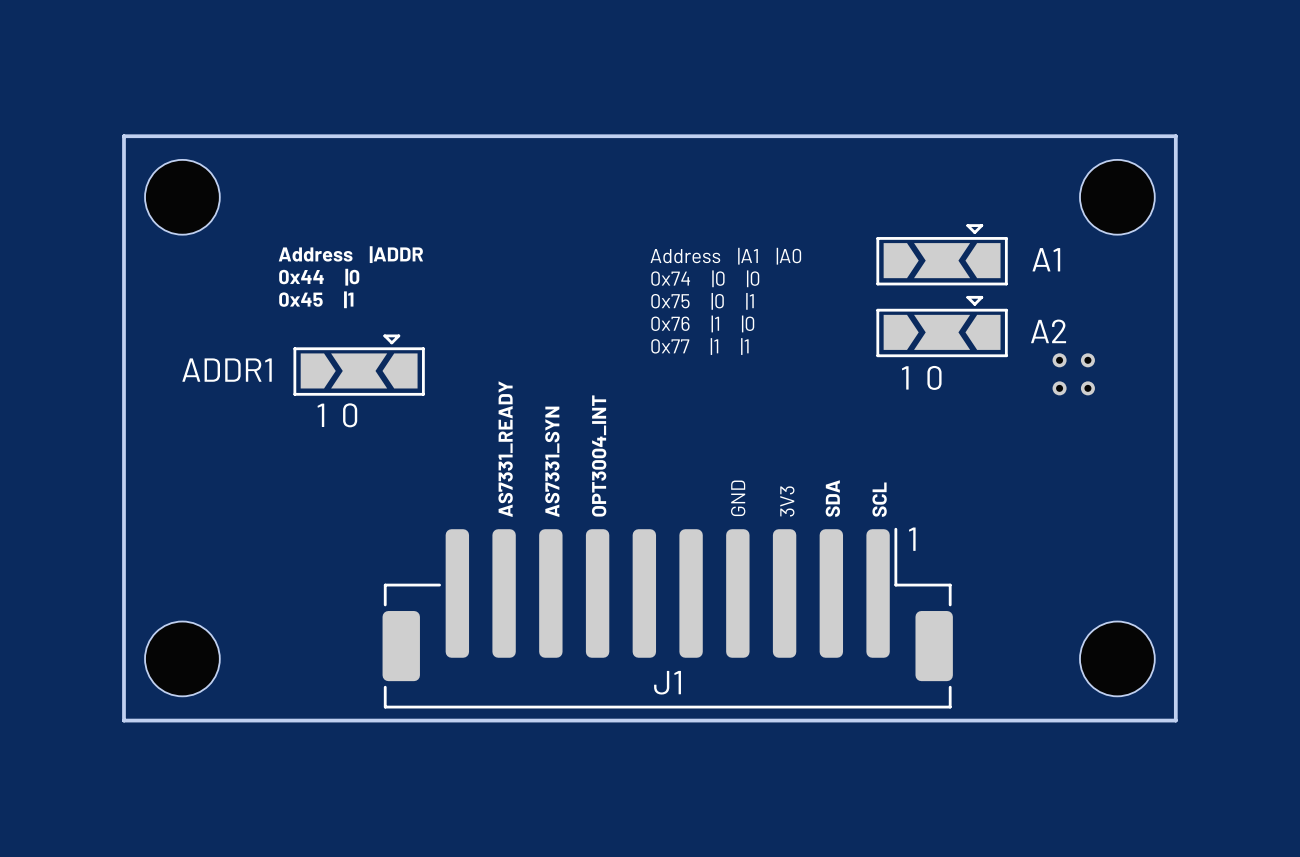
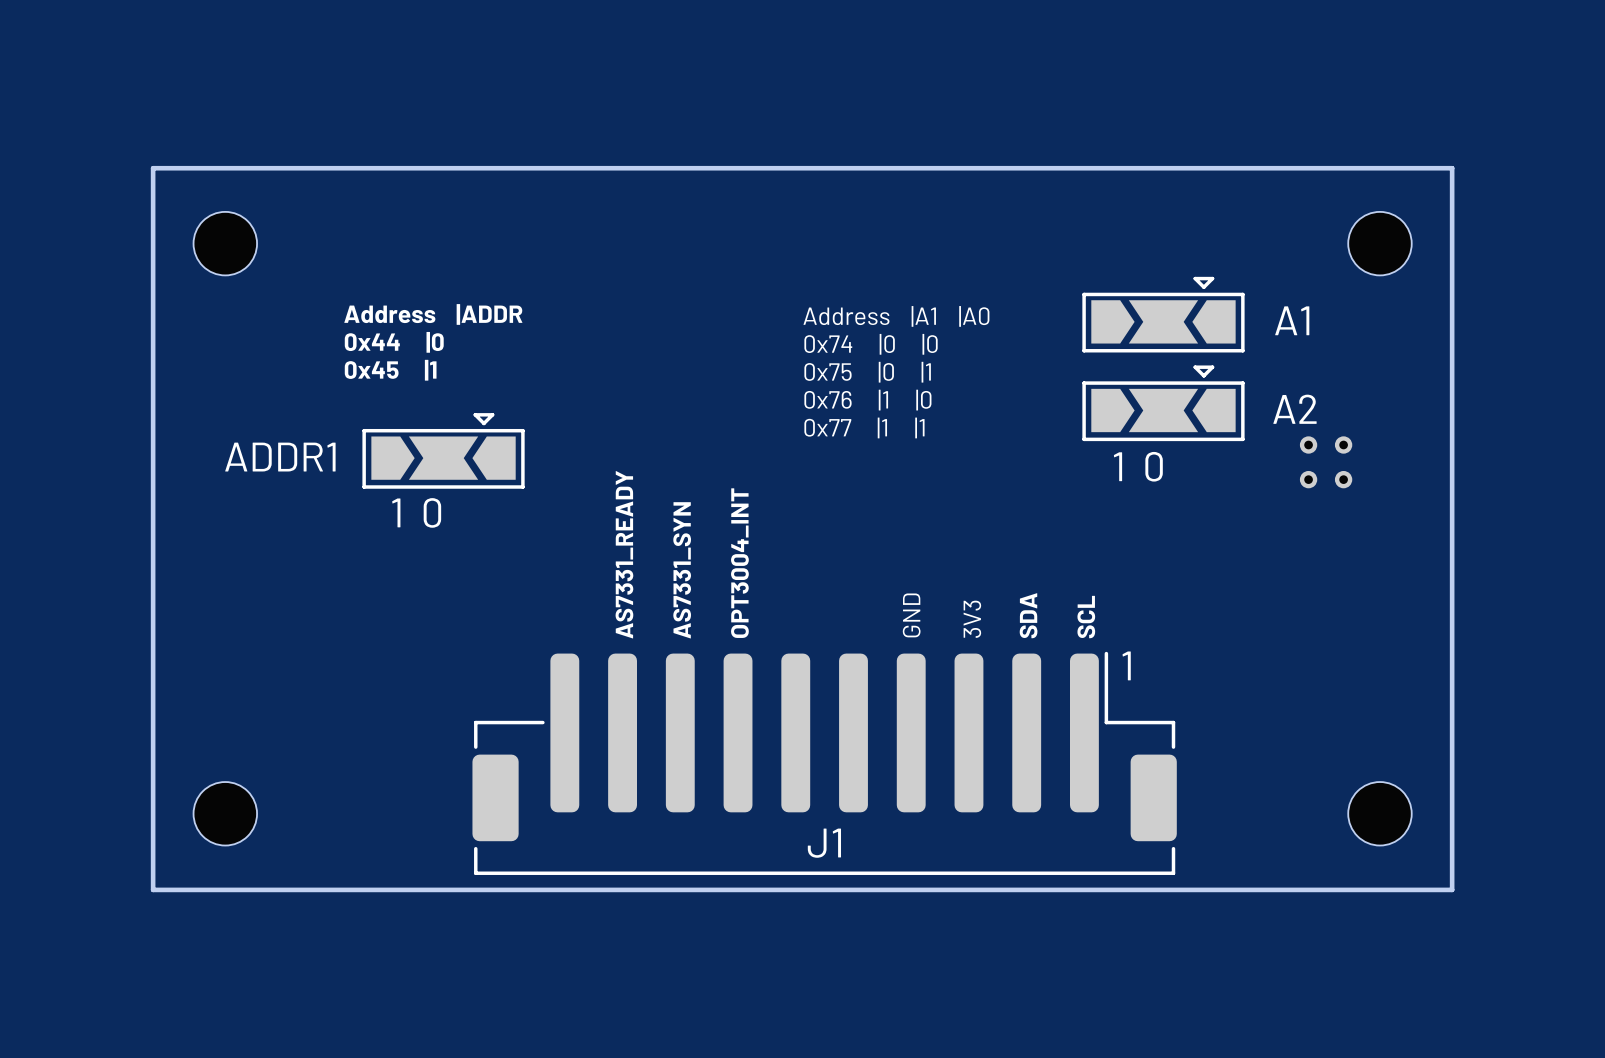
part footprint: [145, 159, 220, 235] -> [193, 211, 258, 276]
part footprint: [1079, 159, 1155, 235] -> [1348, 211, 1412, 276]
part footprint: [145, 621, 220, 697] -> [193, 782, 258, 846]
part footprint: [1079, 621, 1155, 697] -> [1348, 782, 1412, 846]

